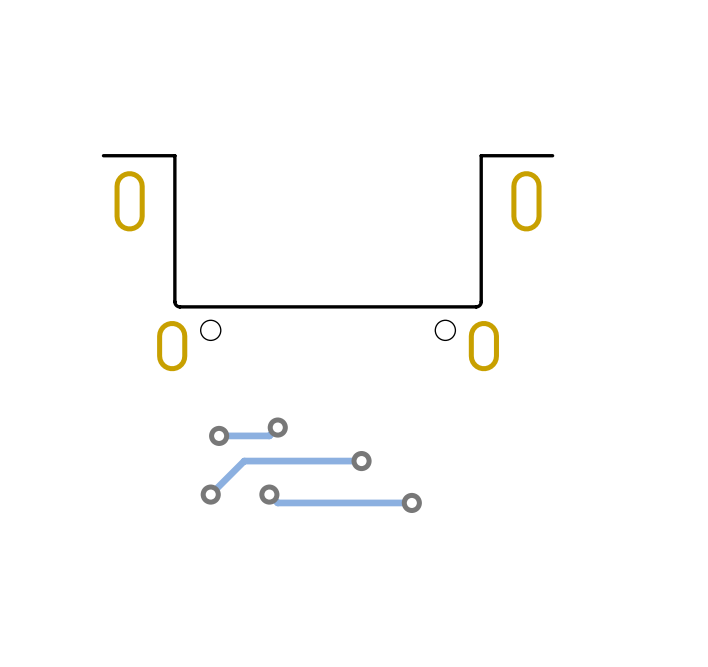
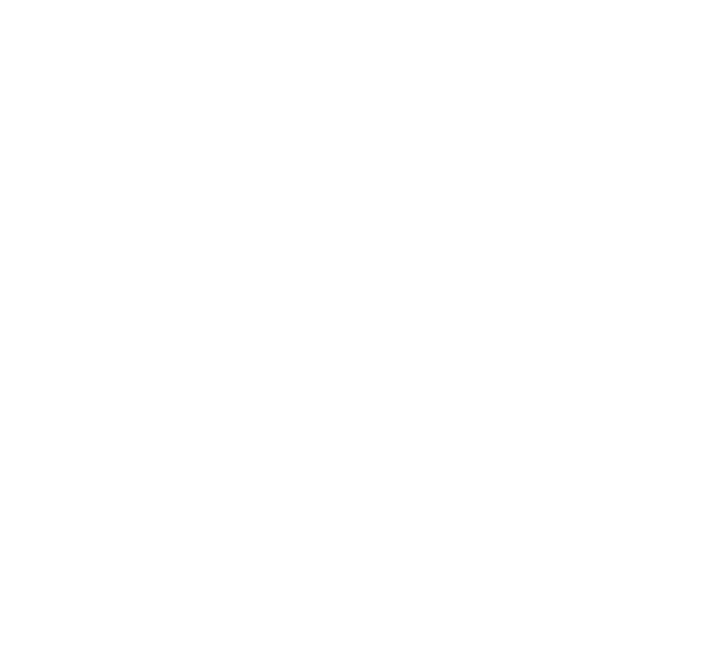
part: (328, 262) -> none
track: (277, 427) (269, 435) (219, 435) -> none
via: (277, 427) -> none
via: (219, 435) -> none
track: (361, 461) (244, 461) (210, 494) -> none
via: (361, 461) -> none
via: (210, 494) -> none
track: (269, 494) (277, 502) (411, 502) -> none
via: (269, 494) -> none
via: (411, 502) -> none

